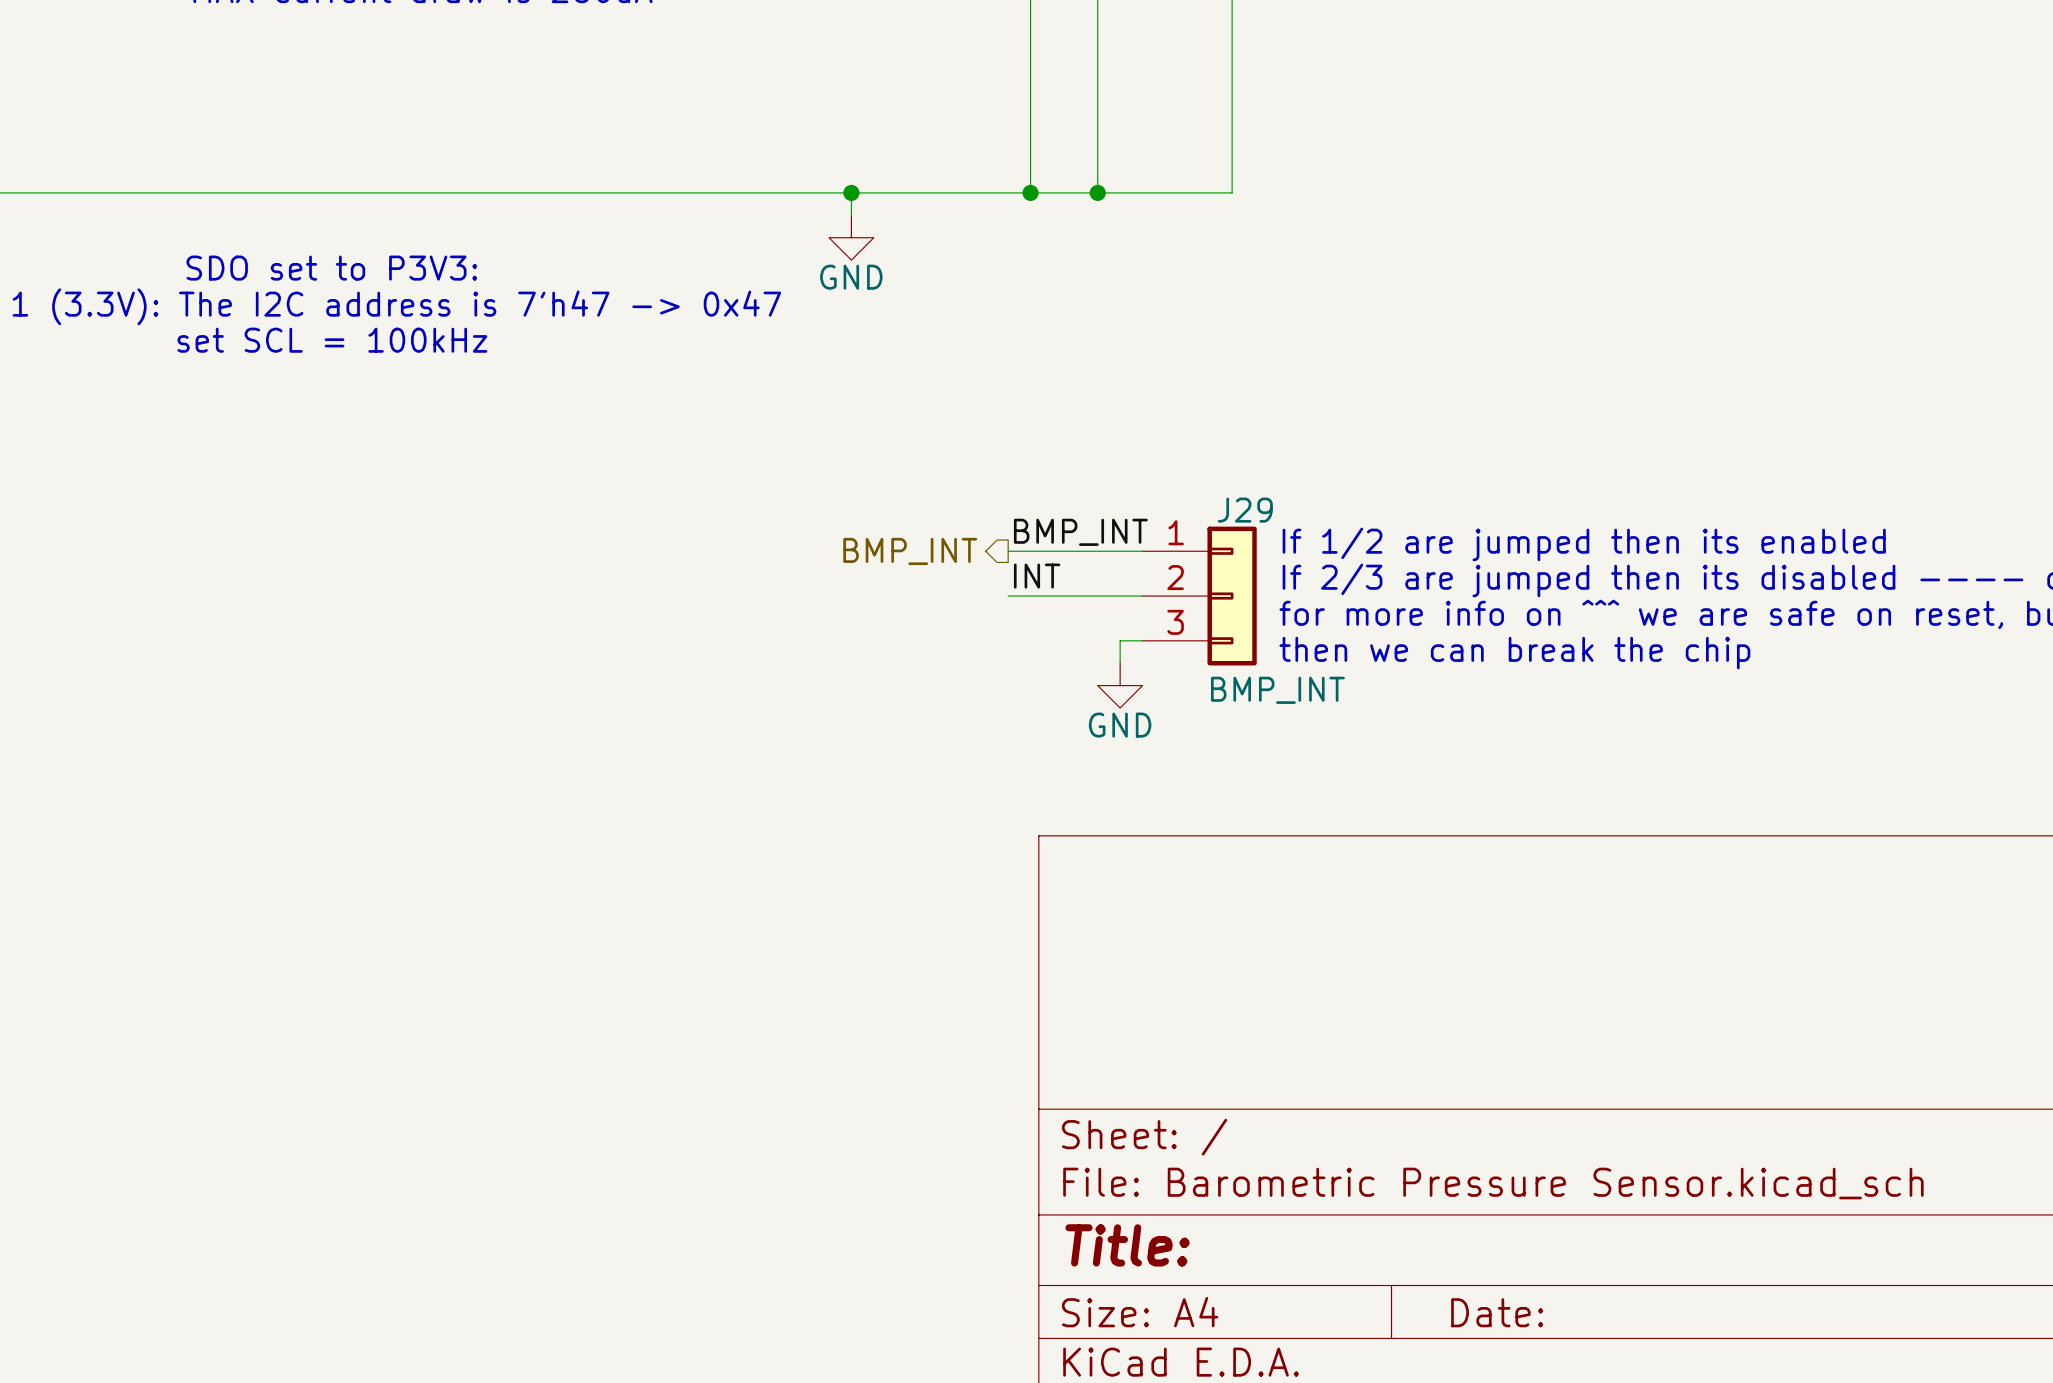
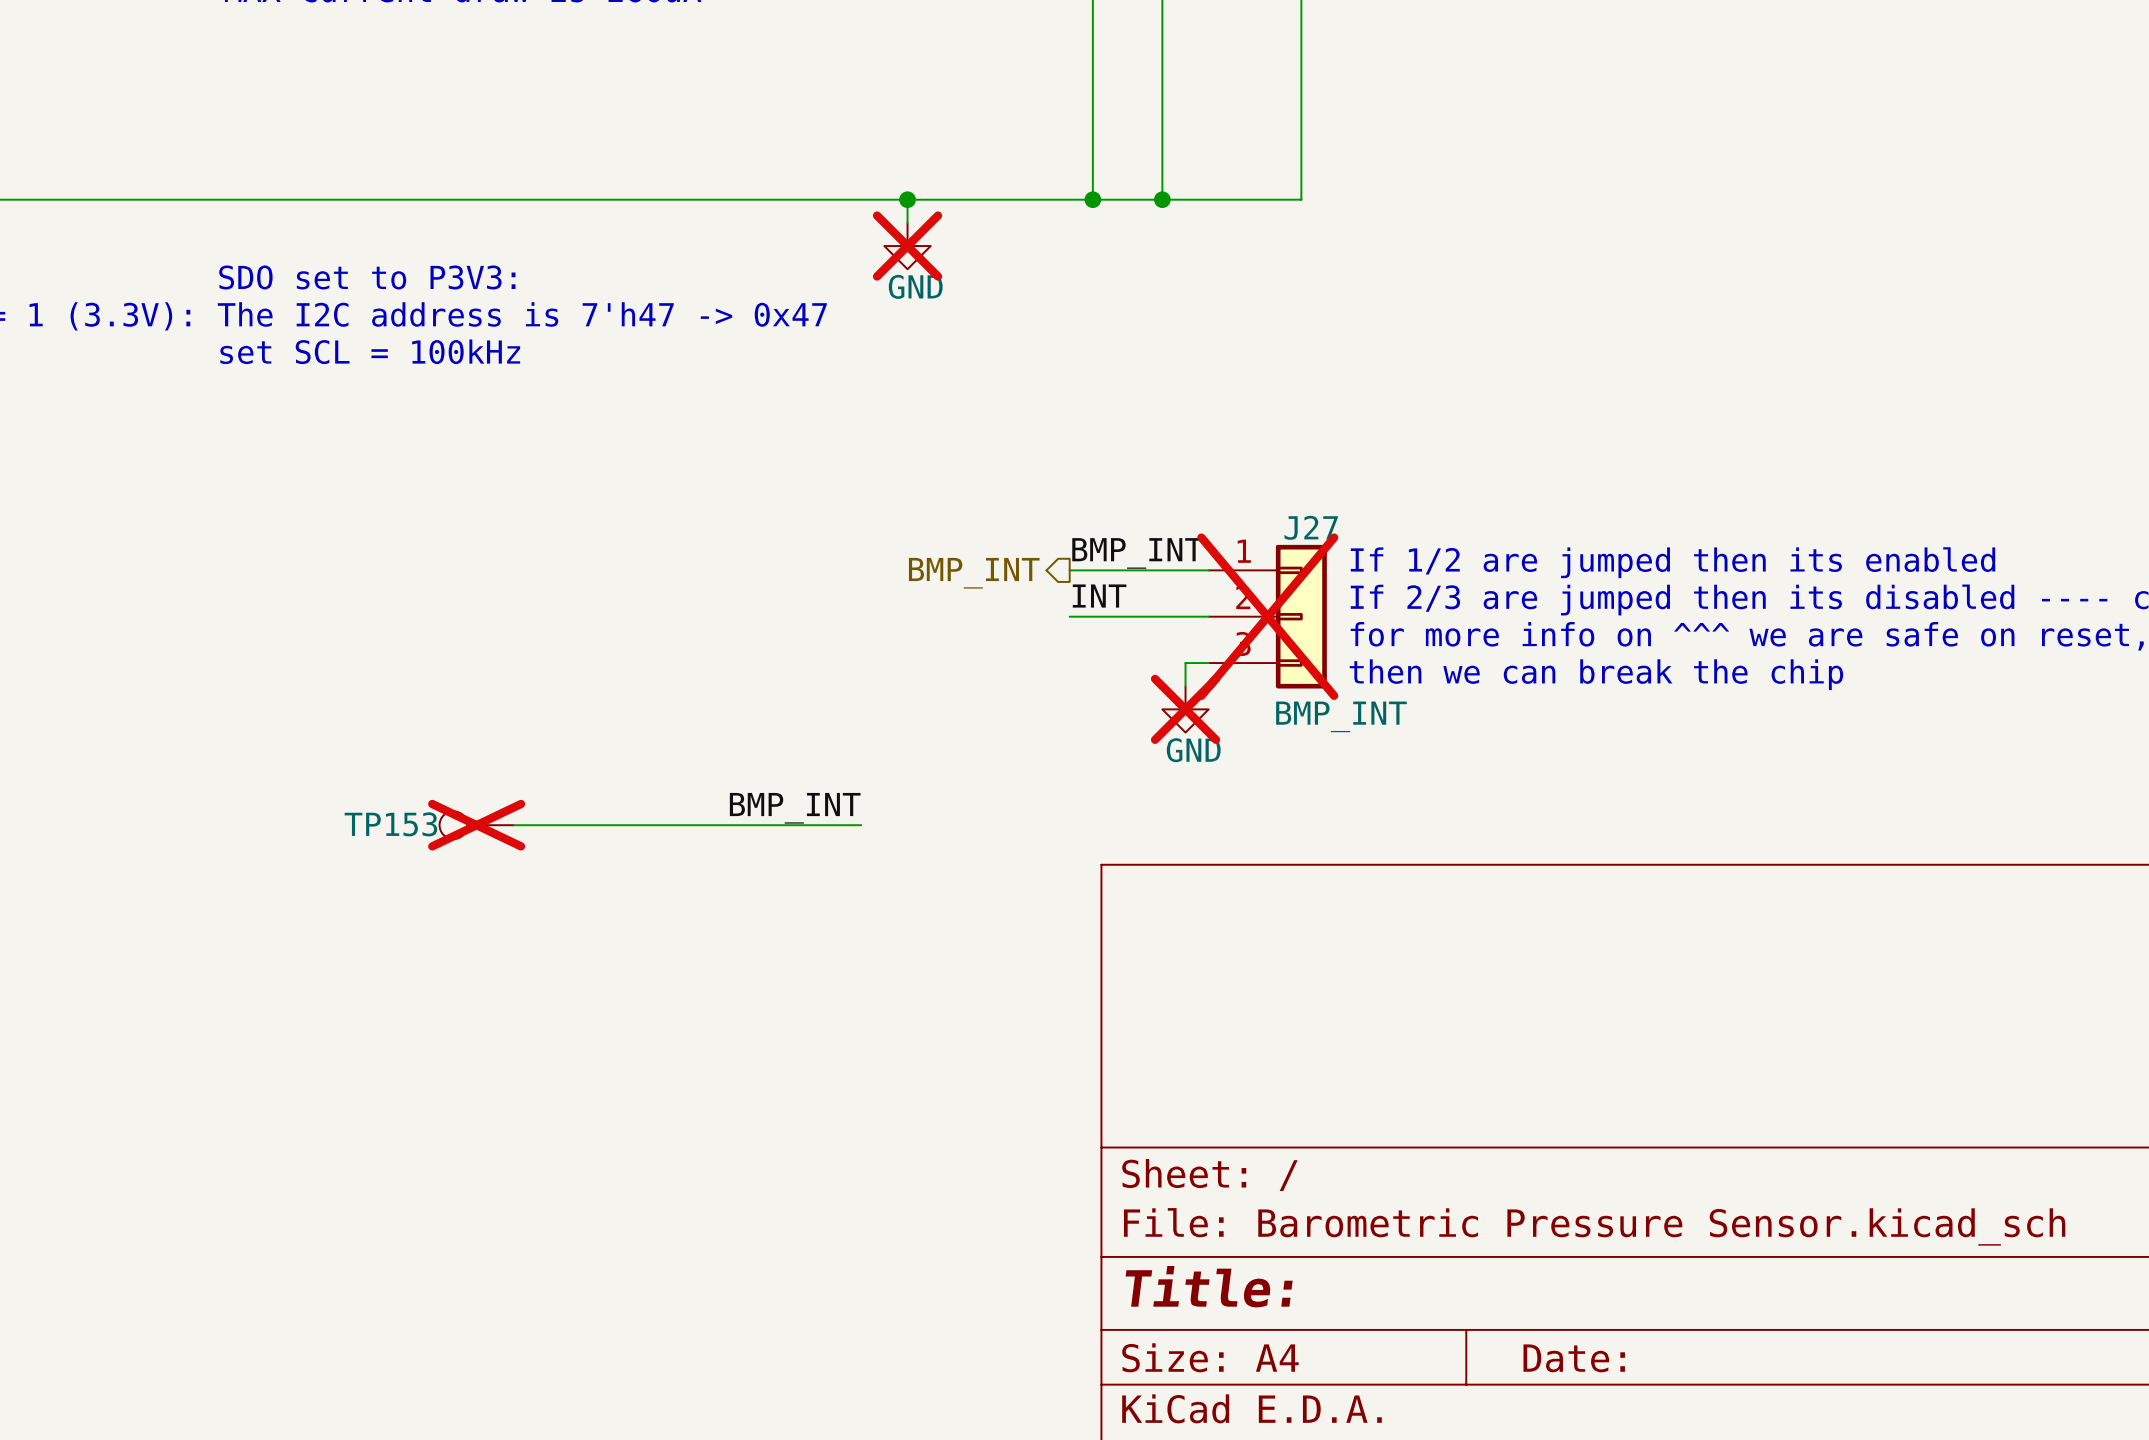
power symbol do-not-place cross: none -> (907, 246)
J29 name: J29 (1245, 510) -> J27 (1311, 527)
J29 do-not-place cross: none -> (1267, 616)
power symbol do-not-place cross: none -> (1185, 709)
label: none -> BMP_INT (795, 808)
TP153: none -> (476, 825)
wire: none -> (513, 825) (861, 825)

